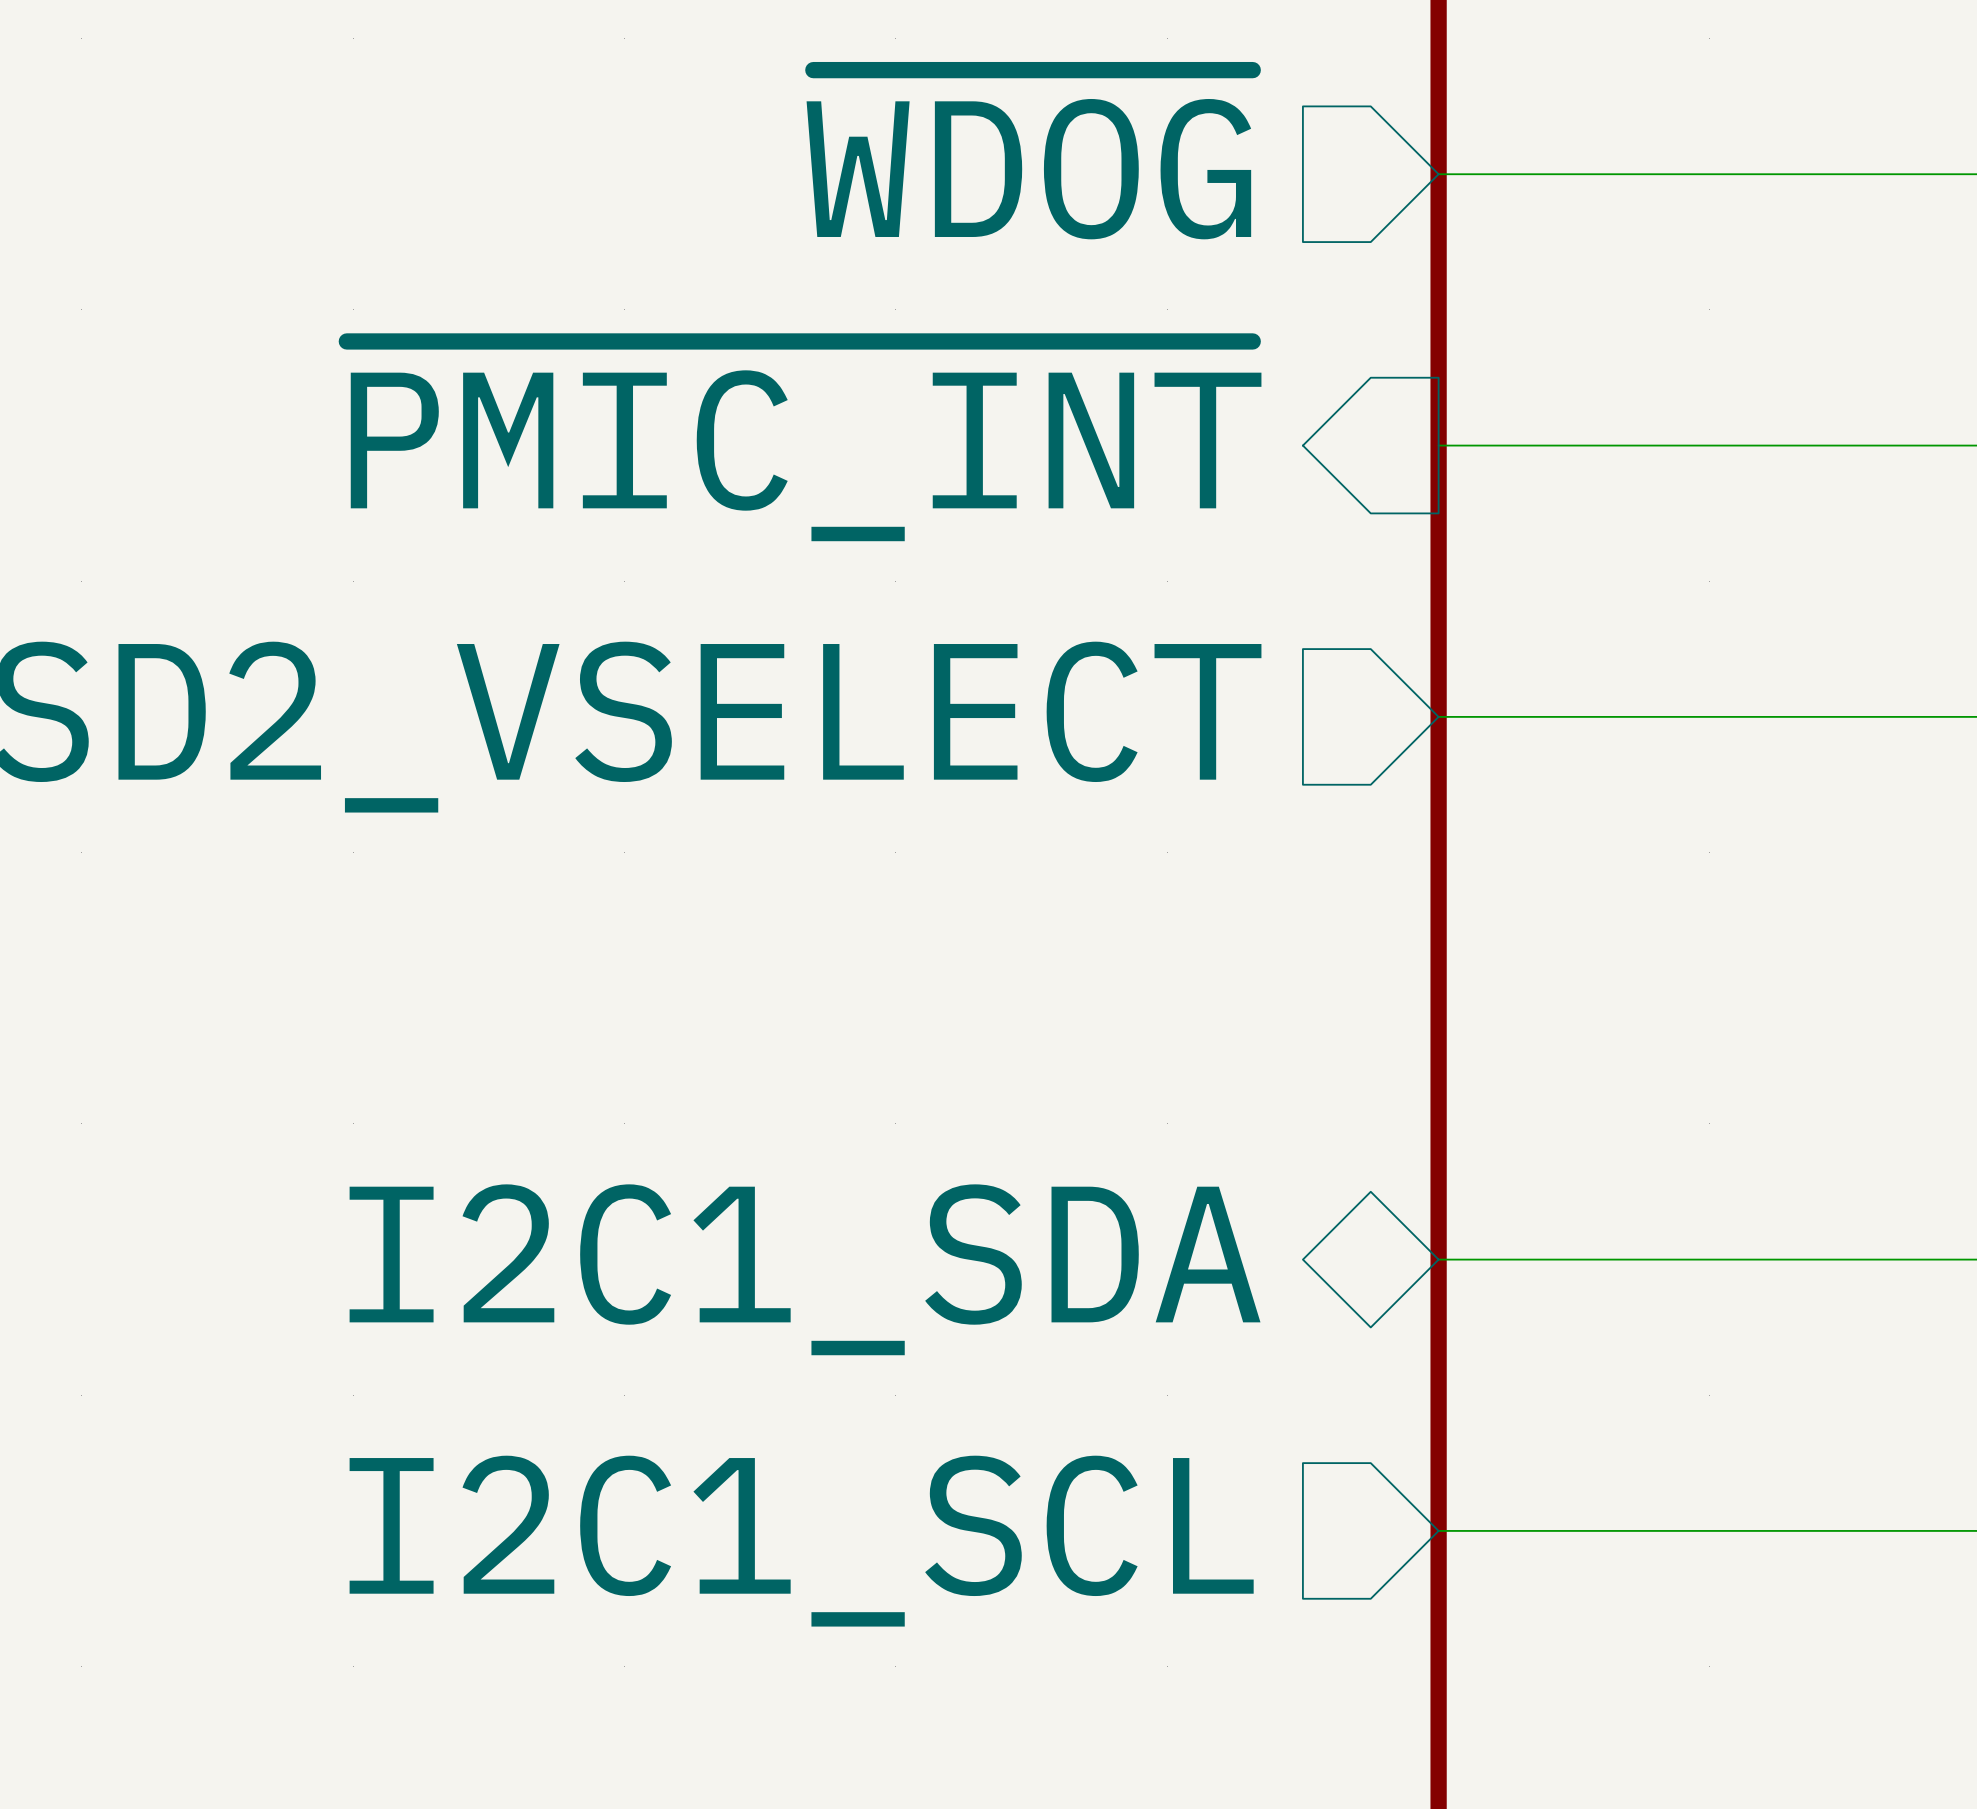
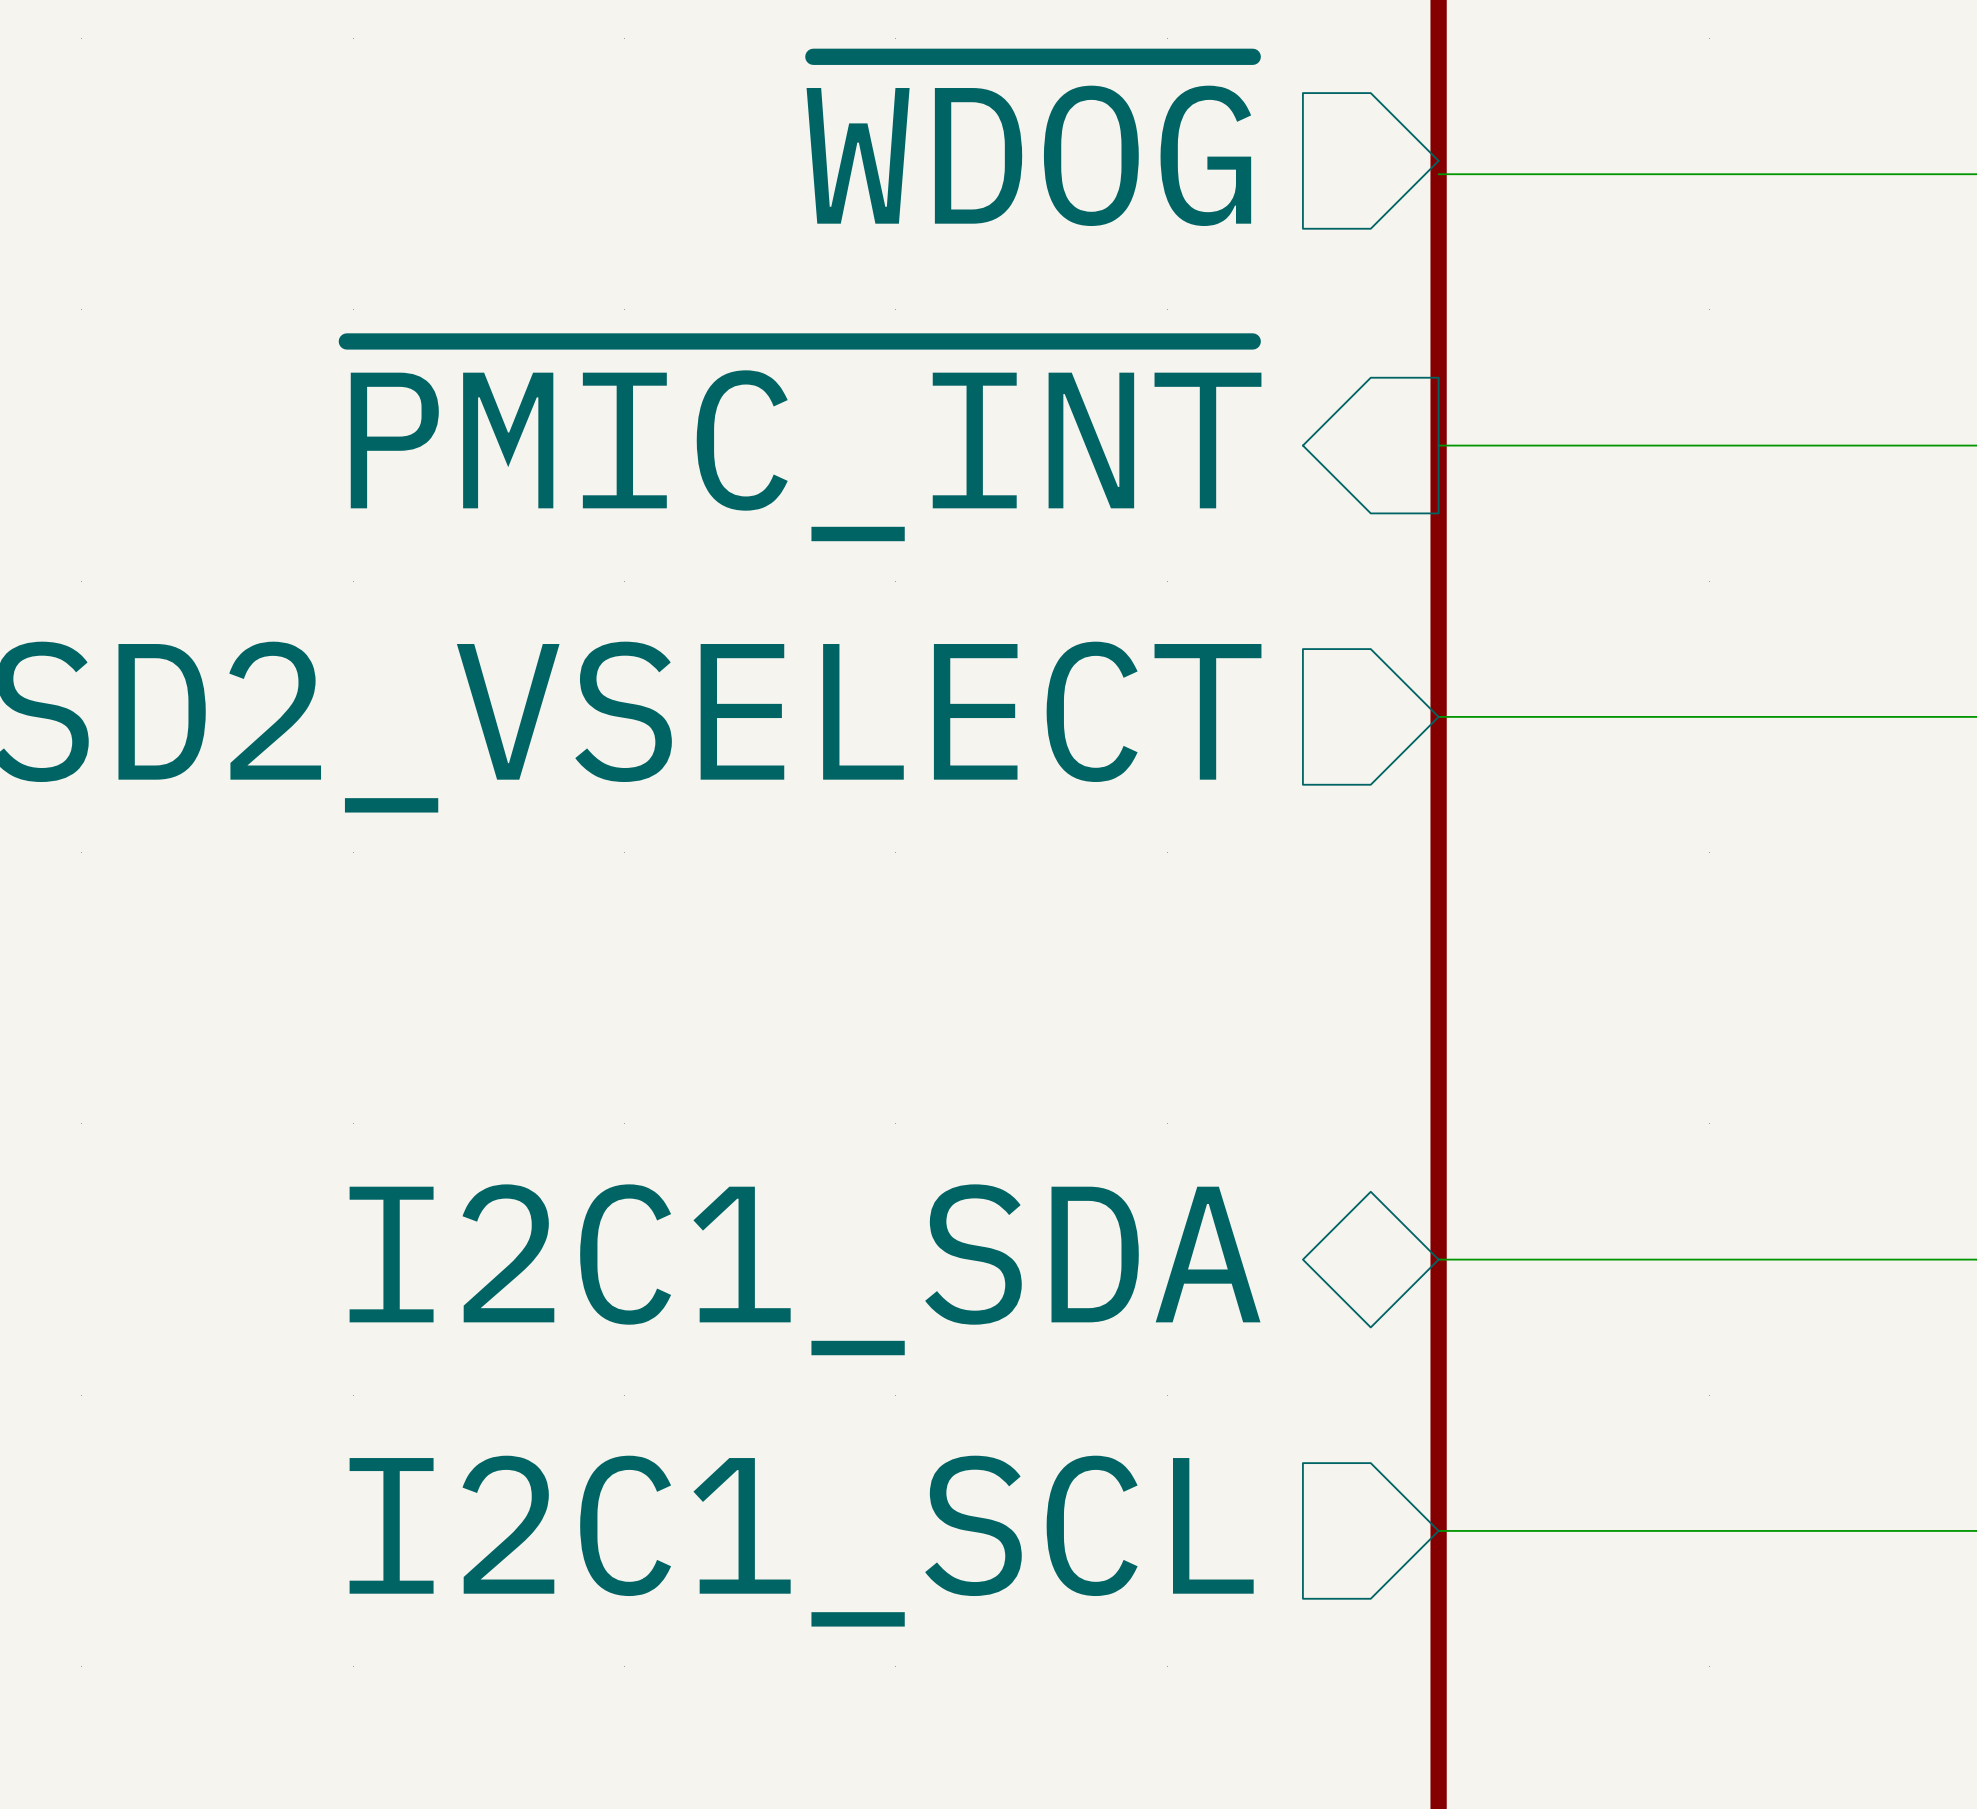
sheet pin position: ~{WDOG} (1029, 154) -> ~{WDOG} (1029, 141)

